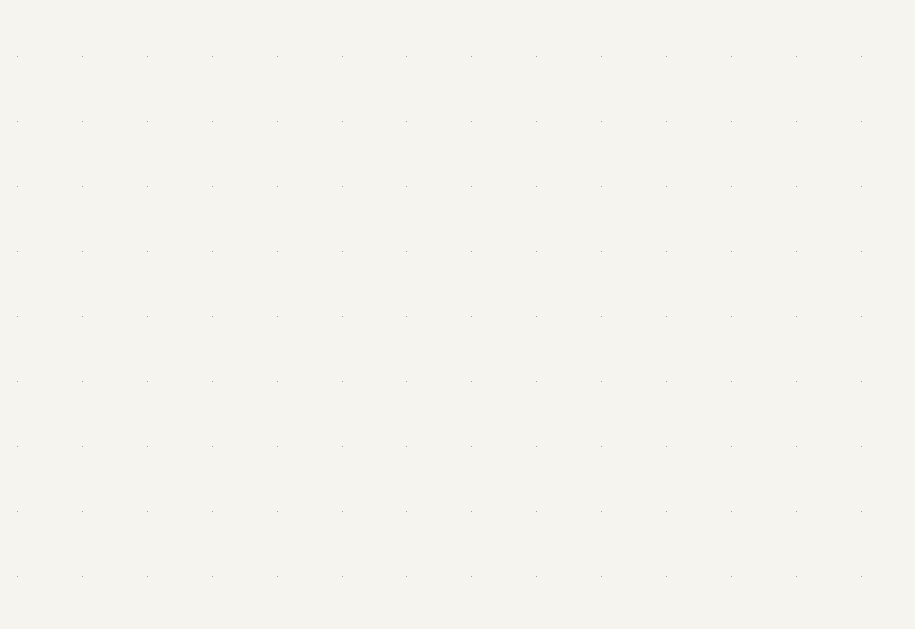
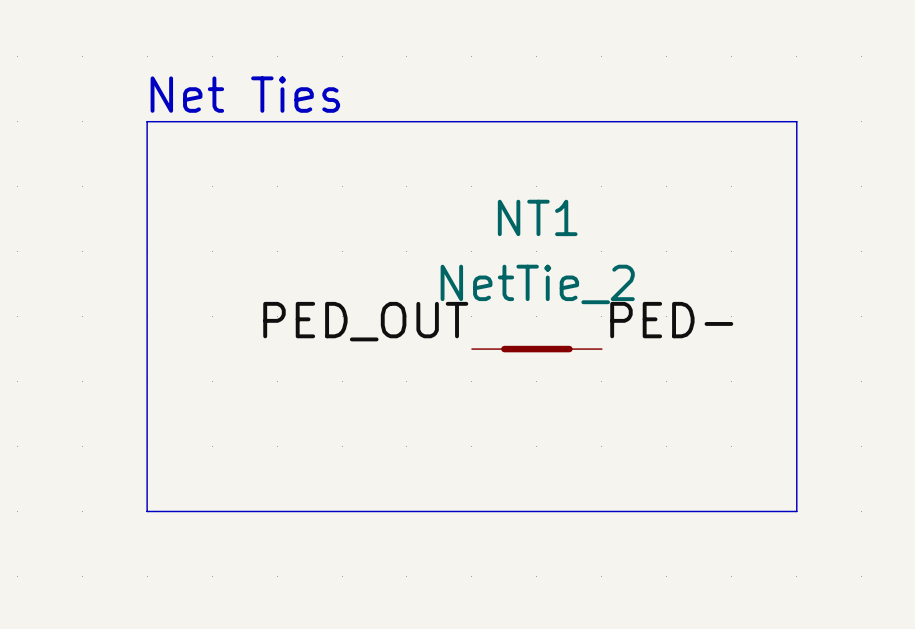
text: none -> Net Ties (245, 94)
line: none -> (147, 121) (796, 121) (796, 511) (147, 511) (147, 121)
label: none -> PED- (671, 320)
label: none -> PED_OUT (365, 321)
NT1: none -> NetTie_2 (536, 349)

